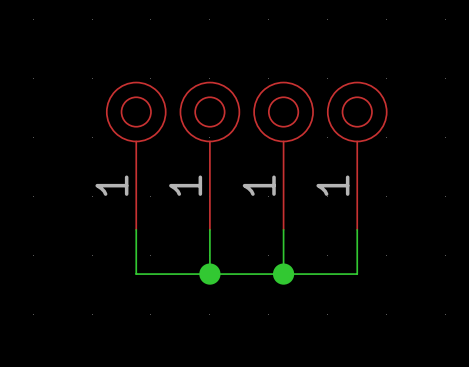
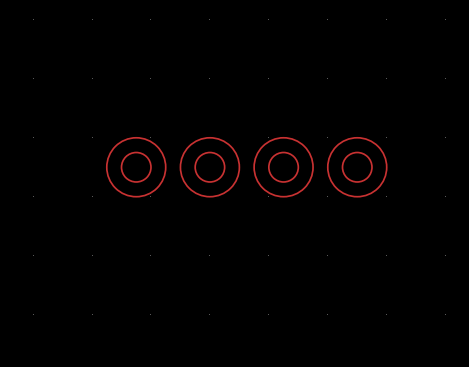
part symbol: [106, 82, 166, 230] -> [106, 137, 166, 197]
part symbol: [180, 82, 240, 230] -> [180, 137, 240, 197]
part symbol: [254, 82, 314, 230] -> [254, 137, 314, 197]
part symbol: [327, 82, 387, 230] -> [327, 137, 387, 197]
wire: (136, 229) (136, 274) (357, 274) (357, 229) -> none
wire: (209, 229) (209, 274) -> none
wire: (283, 229) (283, 274) -> none
junction: (209, 274) -> none
junction: (283, 274) -> none

